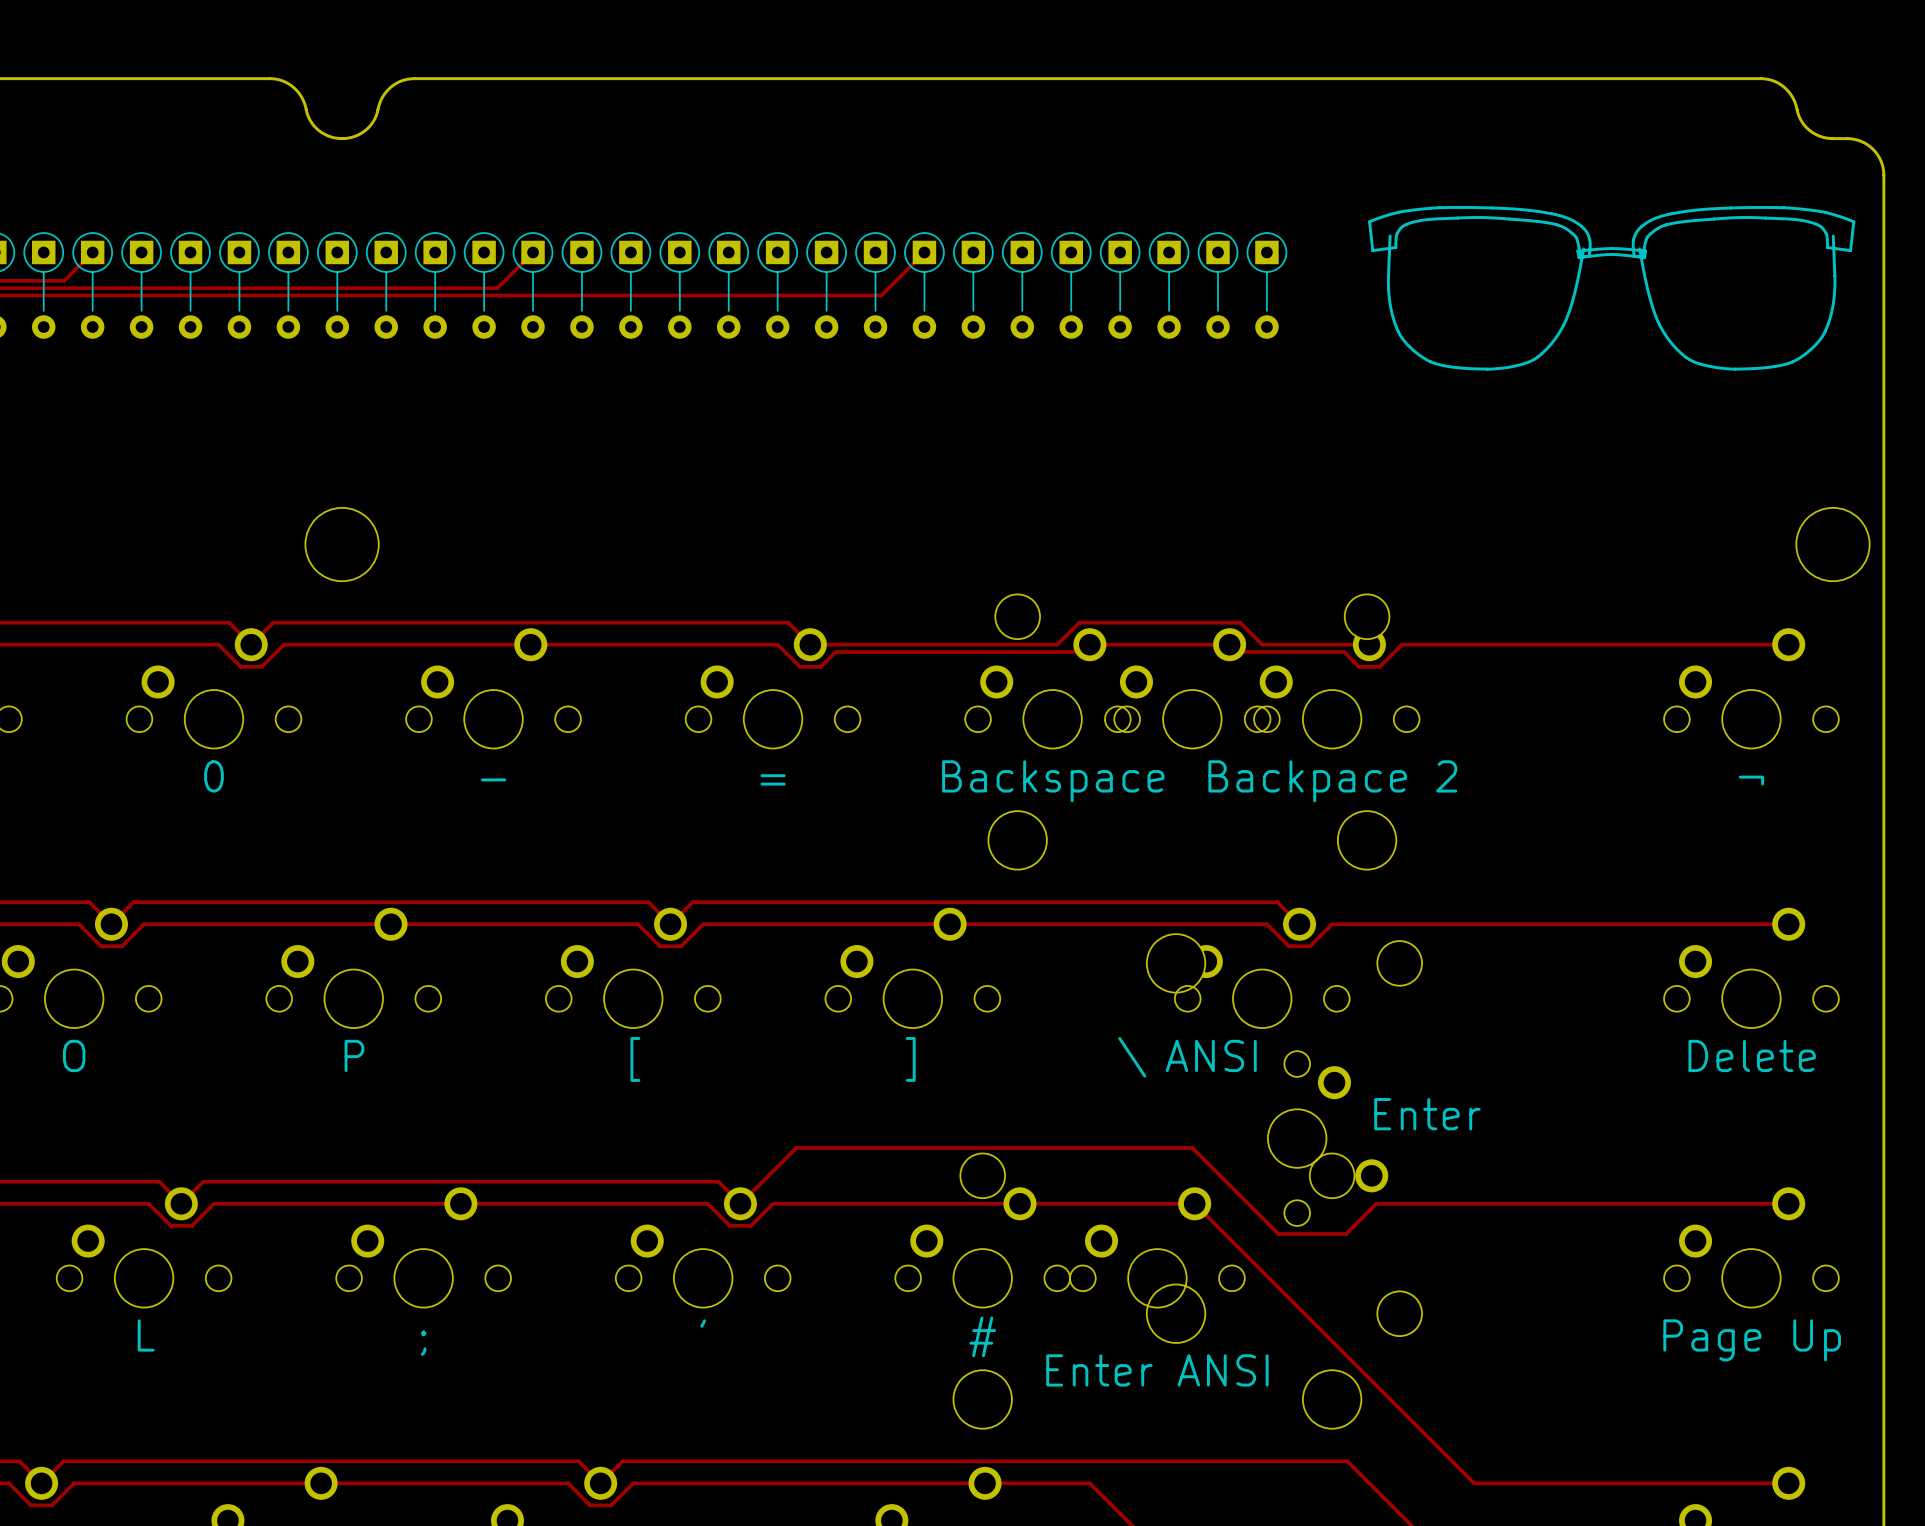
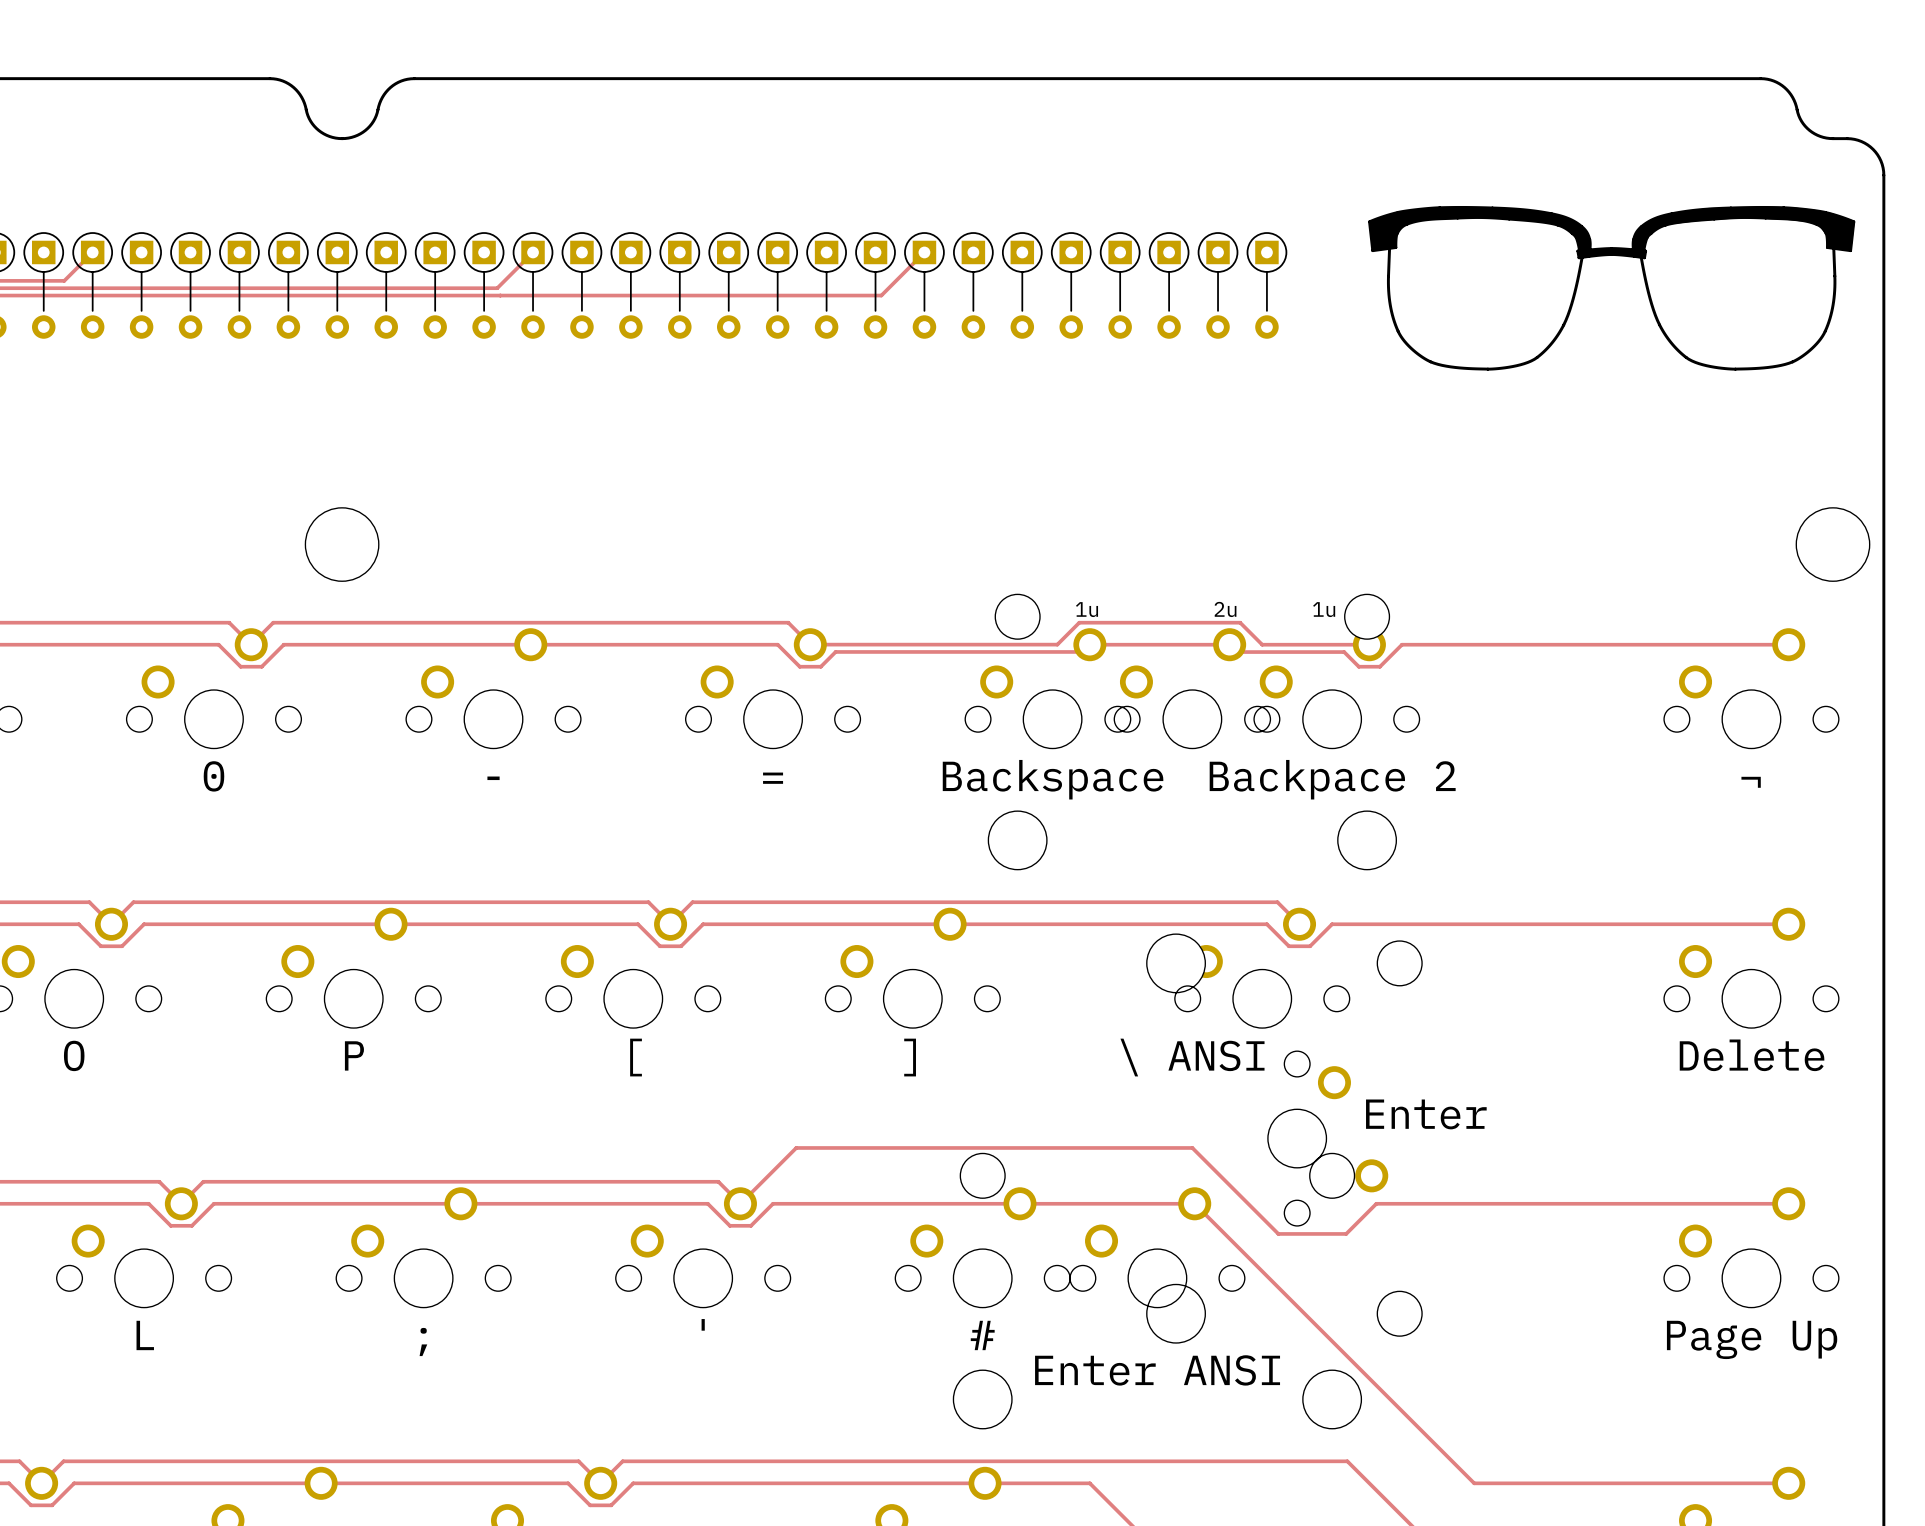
drawing: none -> [1370, 206, 1855, 258]
text: none -> 1u (1087, 609)
text: none -> 2u (1225, 609)
text: none -> 1u (1324, 609)

